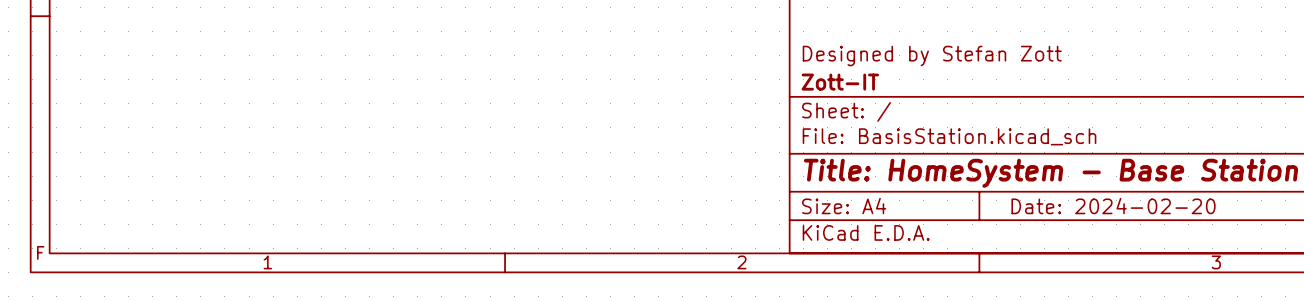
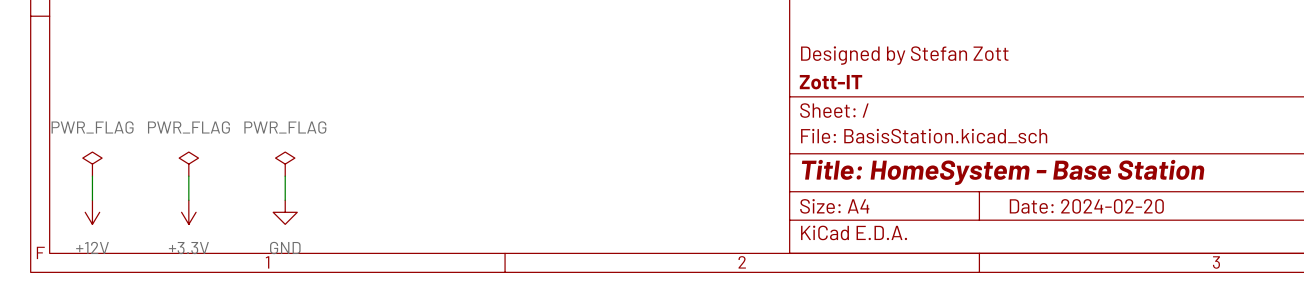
power symbol: none -> PWR_FLAG (92, 164)
power symbol: none -> PWR_FLAG (188, 164)
power symbol: none -> PWR_FLAG (285, 164)
wire: none -> (92, 176) (92, 200)
wire: none -> (188, 176) (188, 200)
wire: none -> (285, 176) (285, 200)
power symbol: none -> +12V (92, 212)
power symbol: none -> +3.3V (188, 212)
power symbol: none -> GND (285, 212)

